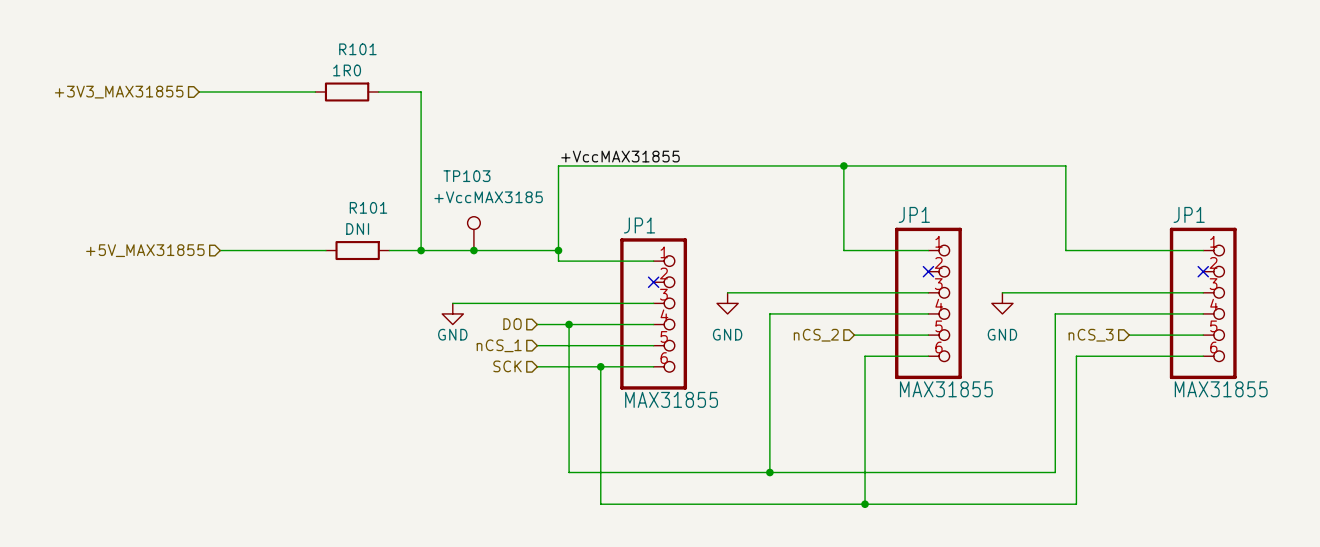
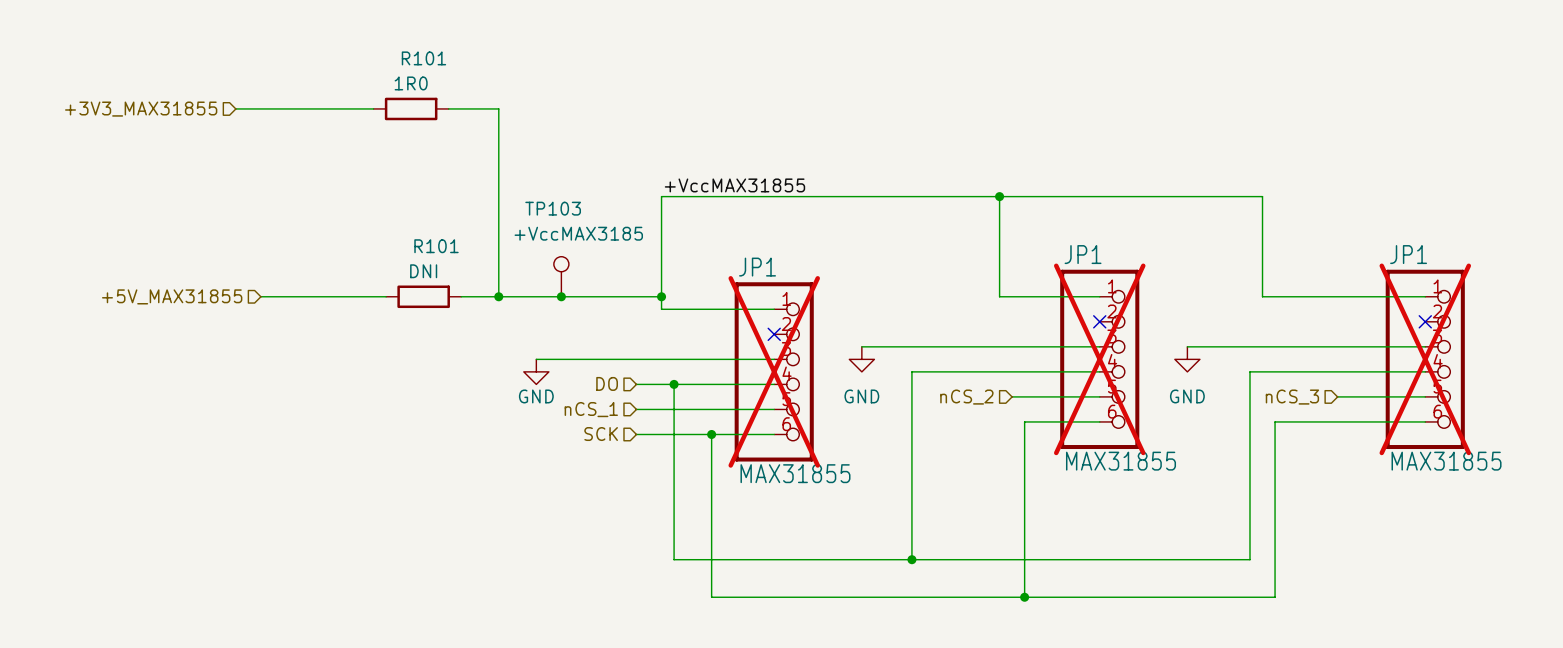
JP1 do-not-place cross: none -> (1099, 359)
JP1 do-not-place cross: none -> (1425, 359)
JP1 do-not-place cross: none -> (774, 371)

